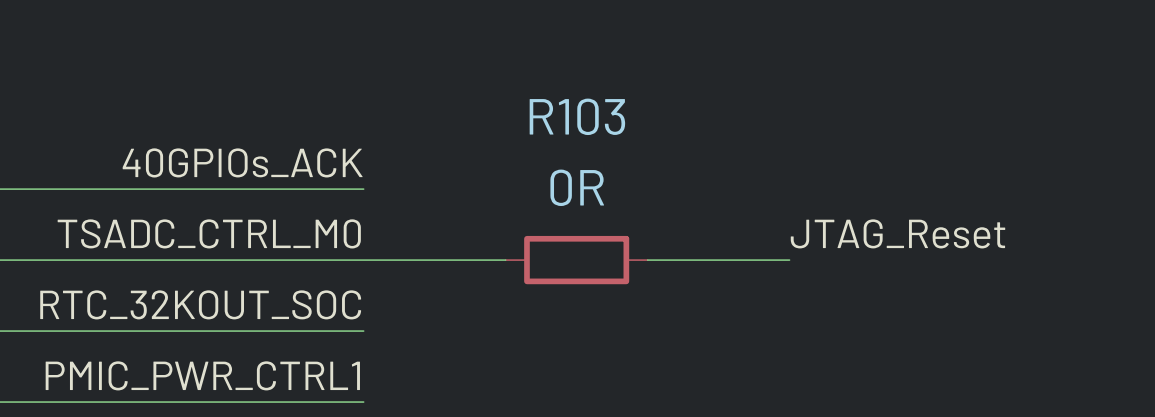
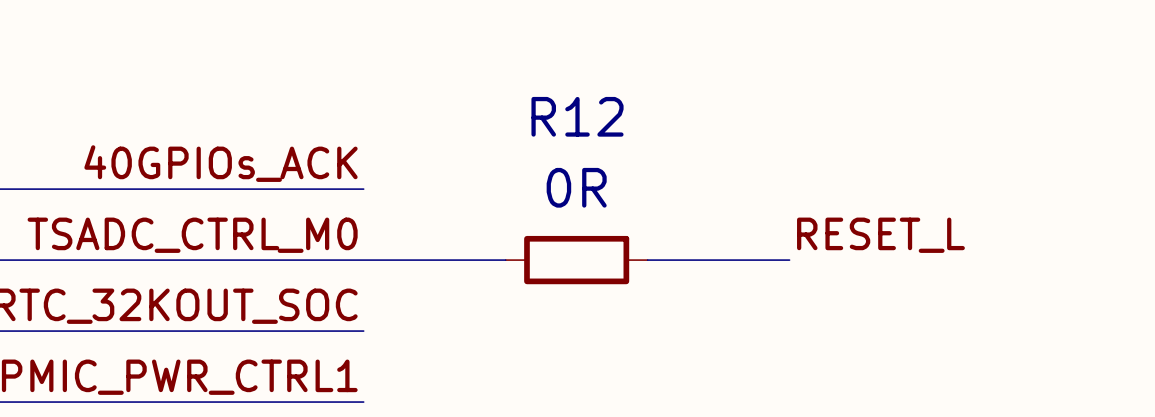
R103 name: R103 (577, 116) -> R12 (577, 116)
label: JTAG_Reset (897, 233) -> RESET_L (880, 235)

